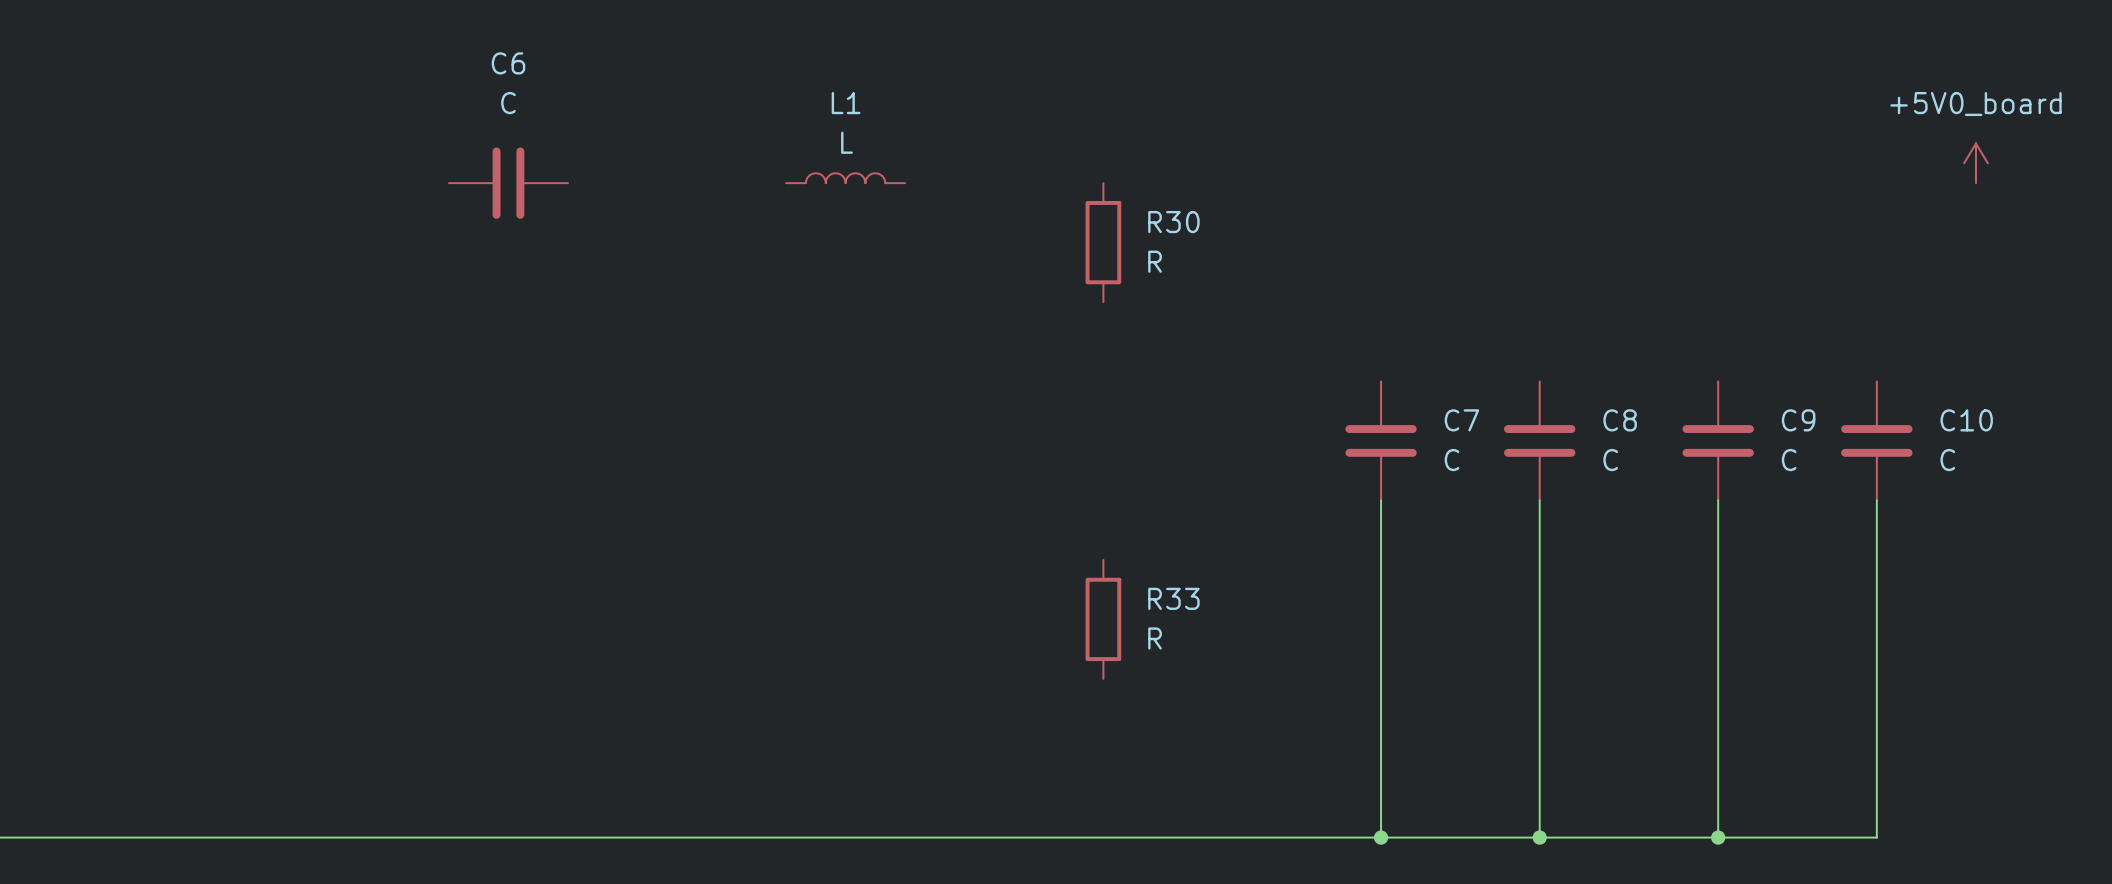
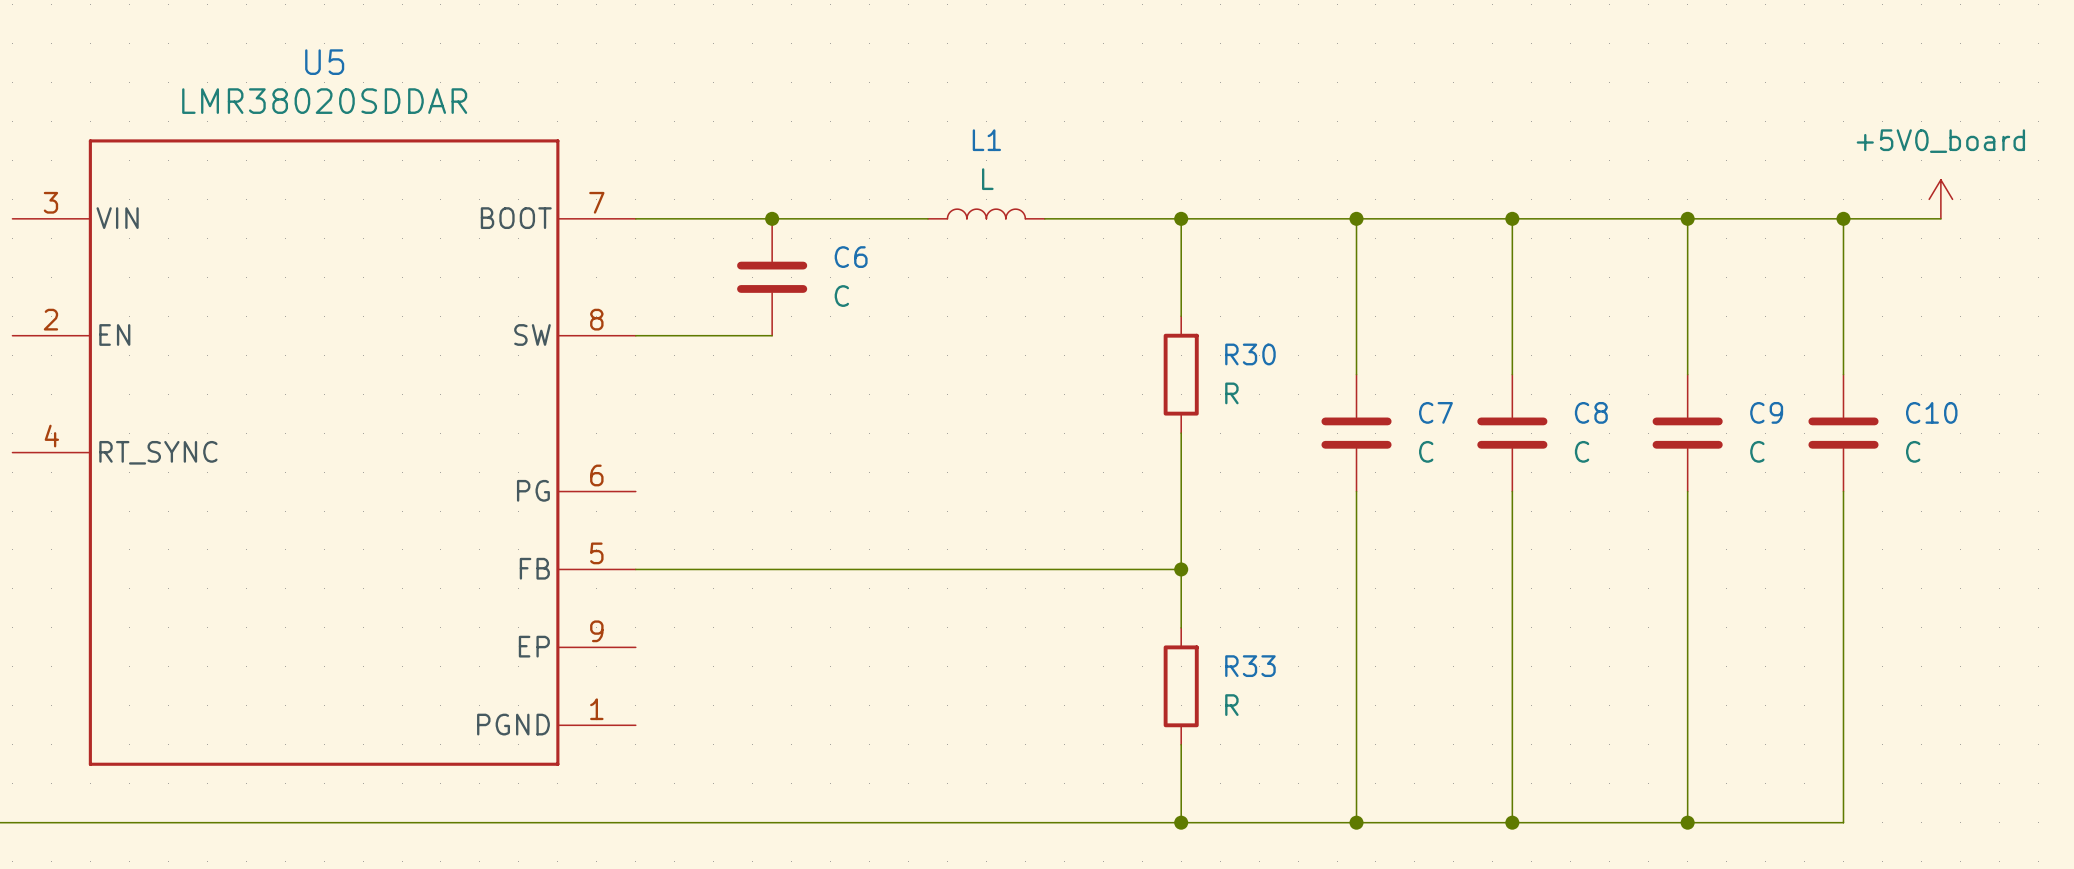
C6 name position: C6 (508, 63) -> C6 (851, 257)
power symbol position: +5V0_board (1975, 163) -> +5V0_board (1940, 199)
L1 position: (845, 178) -> (986, 213)
C6 rotation: 0° (508, 183) -> 90° clockwise (772, 277)
C6 position: (508, 183) -> (772, 277)
wire: none -> (635, 218) (927, 218)
junction: none -> (772, 218)
wire: none -> (1044, 218) (1940, 218)
wire: none -> (1181, 218) (1181, 316)
junction: none -> (1181, 218)
wire: none -> (1356, 218) (1356, 374)
junction: none -> (1356, 218)
wire: none -> (1512, 218) (1512, 374)
junction: none -> (1512, 218)
wire: none -> (1687, 218) (1687, 374)
junction: none -> (1687, 218)
wire: none -> (1843, 218) (1843, 374)
junction: none -> (1843, 218)
R30 position: (1103, 242) -> (1181, 374)
wire: none -> (635, 335) (772, 335)
wire: none -> (1181, 433) (1181, 627)
U5: none -> LMR38020SDDAR (324, 452)
wire: none -> (635, 569) (1181, 569)
junction: none -> (1181, 569)
R33 position: (1103, 619) -> (1181, 686)
wire: none -> (1181, 744) (1181, 822)
junction: none -> (1181, 822)

